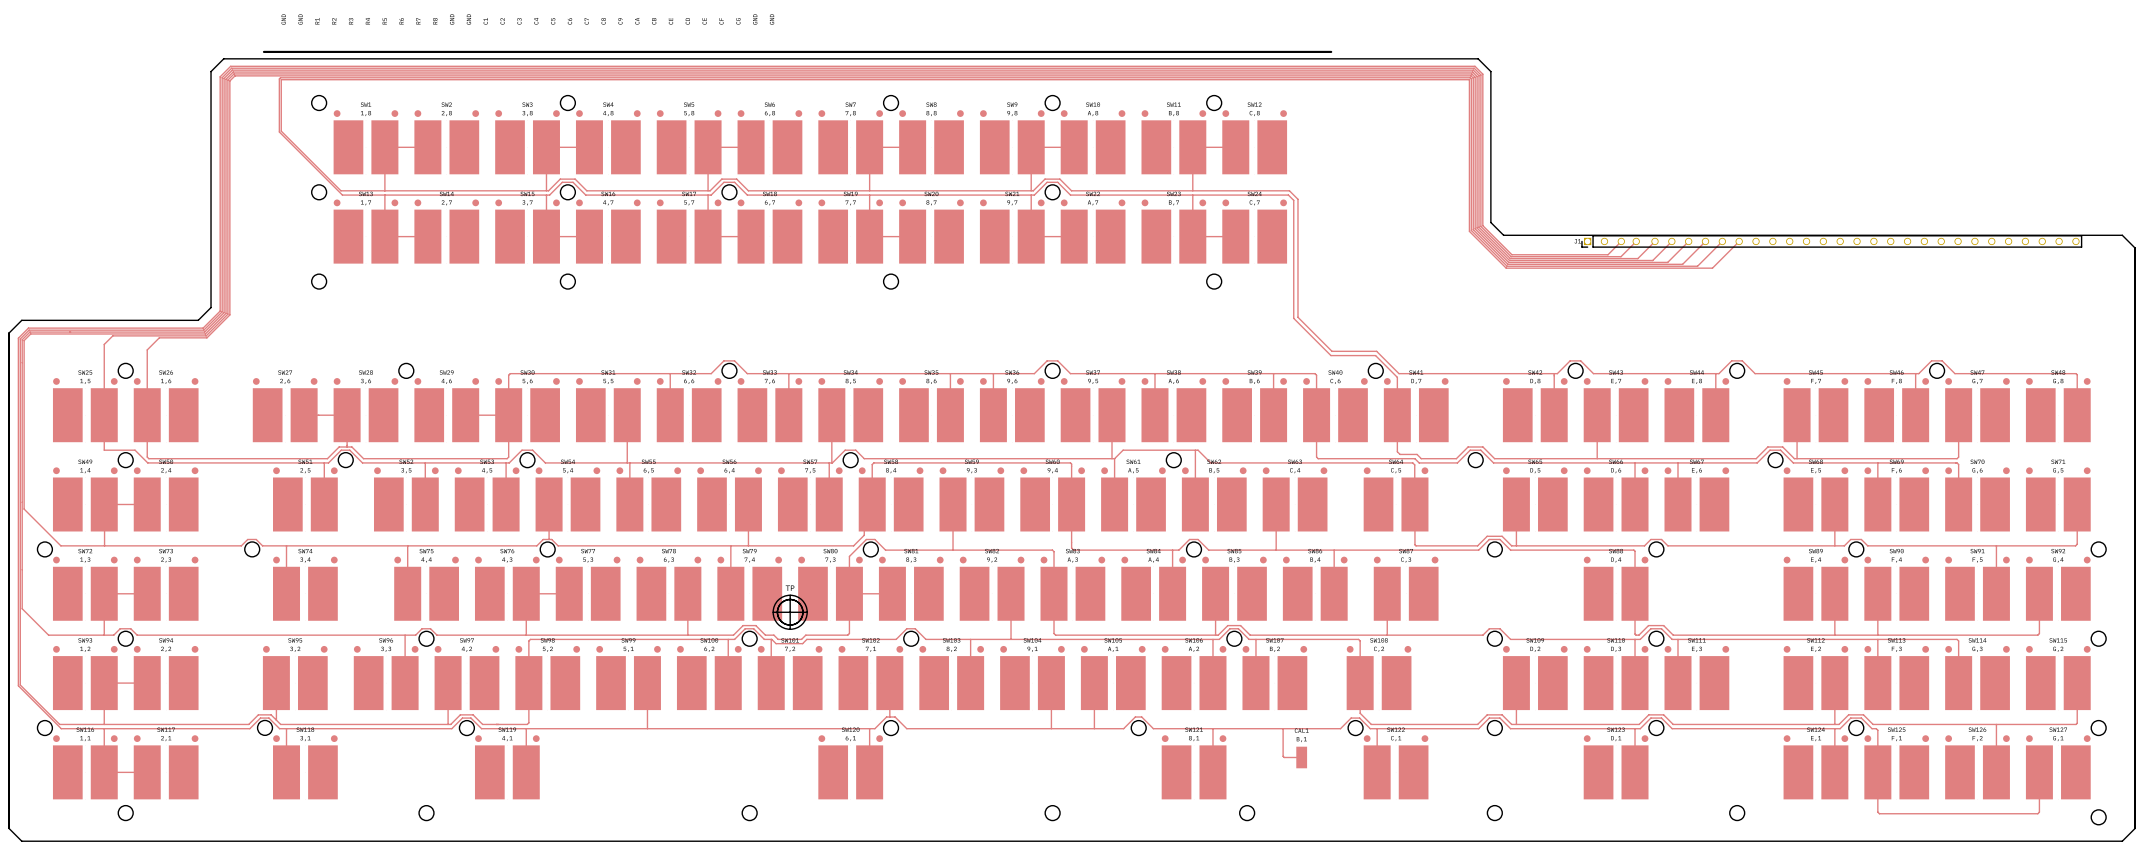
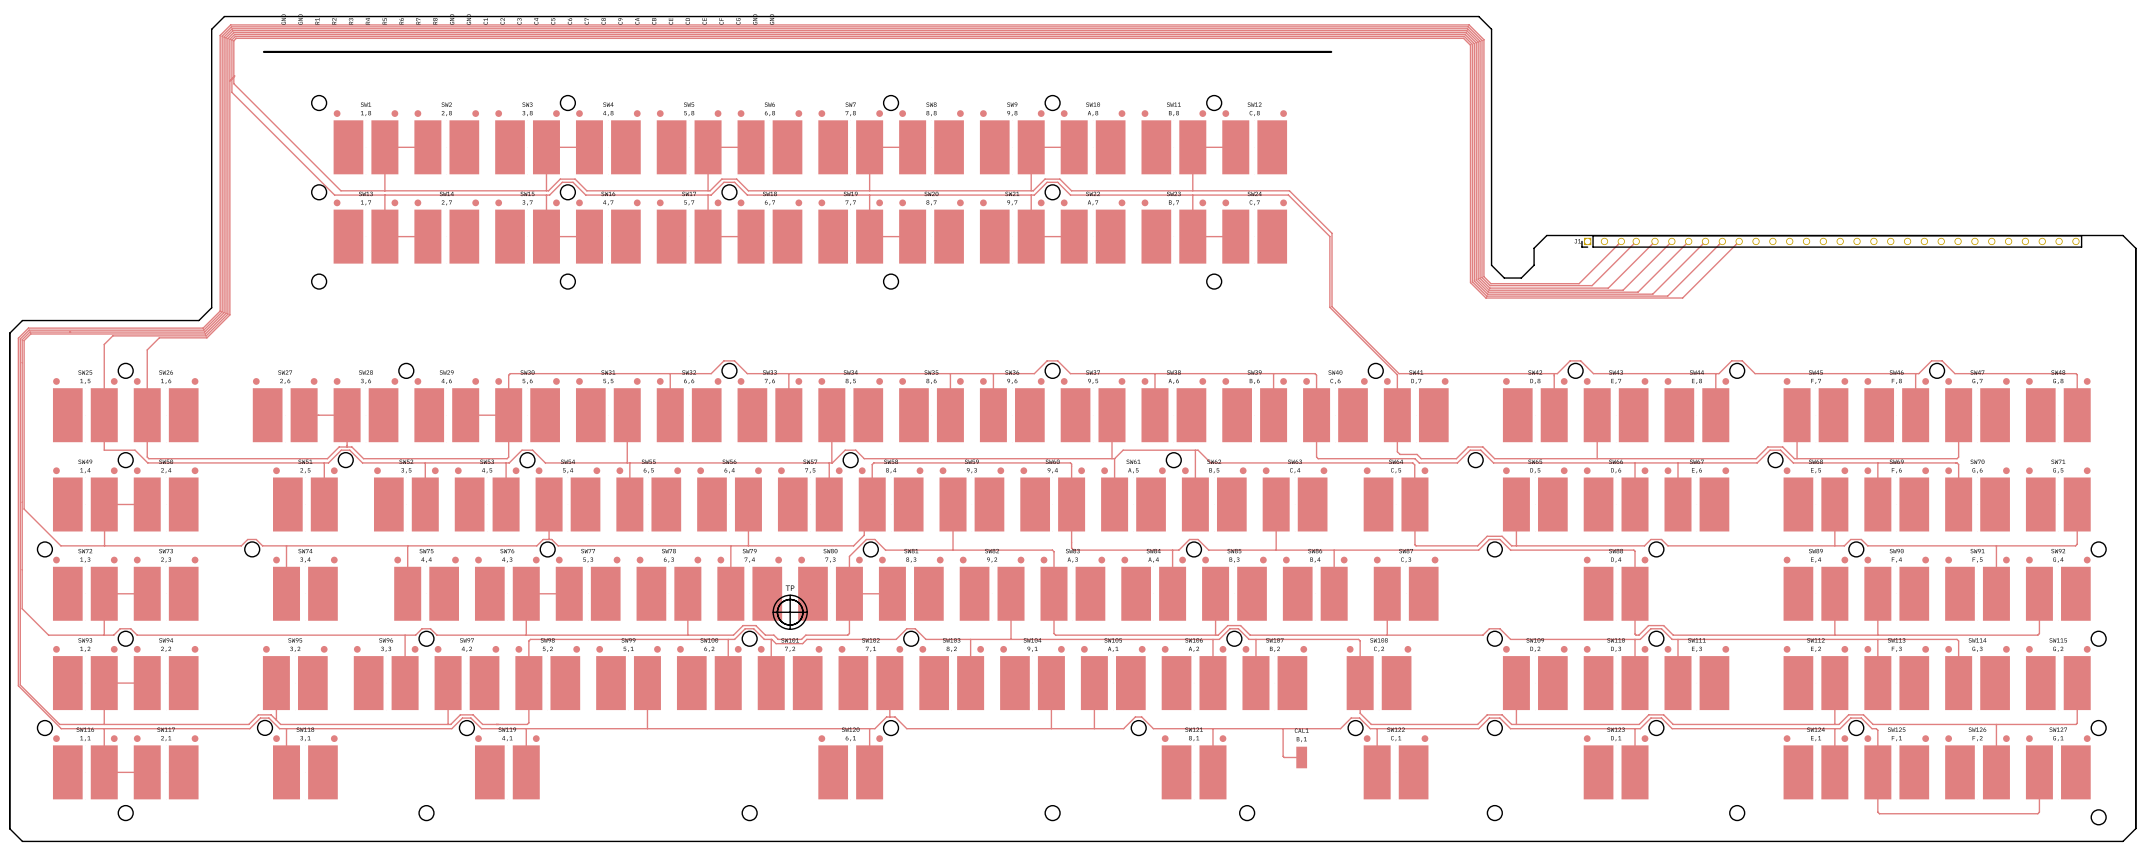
board edge: (223, 58) (1478, 58) (1490, 71) (1490, 222) (1503, 235) (2122, 235) (2135, 248) (2135, 828) (2122, 841) (21, 841) (9, 828) (9, 333) (21, 320) (198, 320) (211, 307) (211, 71) (223, 58) -> (224, 16) (211, 29) (211, 307) (198, 320) (22, 320) (9, 333) (9, 828) (22, 841) (2122, 841) (2135, 828) (2135, 248) (2122, 235) (1546, 235) (1534, 248) (1534, 265) (1521, 278) (1504, 278) (1491, 265) (1491, 29) (1478, 16) (224, 16)
track: (234, 75) (1471, 75) (1473, 78) (1473, 229) (1507, 264) (1682, 264) -> (229, 80) (229, 39) (234, 34) (1465, 34) (1474, 43) (1474, 280) (1487, 294) (1652, 294) (1682, 264)
track: (220, 76) (230, 66) (1474, 66) (1482, 74) (1482, 225) (1511, 254) (1608, 254) -> (220, 76) (220, 35) (230, 24) (1469, 24) (1483, 39) (1483, 276) (1490, 283) (1579, 283) (1608, 254)
track: (222, 77) (231, 68) (1474, 68) (1480, 74) (1480, 226) (1511, 256) (1621, 256) -> (222, 77) (222, 36) (231, 26) (1468, 26) (1482, 40) (1482, 277) (1490, 285) (1592, 285) (1621, 256)
track: (224, 78) (232, 70) (1473, 70) (1479, 75) (1479, 227) (1510, 258) (1637, 258) -> (224, 78) (224, 36) (232, 28) (1467, 28) (1480, 41) (1480, 278) (1489, 288) (1608, 288) (1637, 258)
track: (226, 79) (233, 72) (1472, 72) (1477, 76) (1477, 228) (1509, 260) (1652, 260) -> (226, 79) (226, 37) (233, 30) (1466, 30) (1478, 42) (1478, 279) (1489, 290) (1623, 290) (1652, 260)
track: (227, 80) (234, 73) (1471, 73) (1475, 77) (1475, 228) (1508, 262) (1667, 262) -> (227, 80) (227, 38) (233, 32) (1465, 32) (1476, 42) (1476, 280) (1488, 292) (1637, 292) (1667, 262)
track: (281, 131) (281, 79) (1469, 79) (1469, 231) (1506, 268) (1712, 268) -> (281, 131) (233, 83) (233, 40) (236, 38) (1463, 38) (1470, 45) (1470, 282) (1485, 298) (1682, 298) (1712, 268)
track: (342, 195) (279, 132) (280, 77) (1470, 77) (1471, 230) (1507, 266) (1697, 266) -> (342, 195) (334, 195) (231, 92) (231, 39) (235, 36) (1464, 36) (1472, 44) (1472, 281) (1486, 296) (1667, 296) (1697, 266)
track: (1297, 199) (1297, 317) (1332, 351) (1376, 351) -> (1297, 199) (1332, 233) (1332, 306) (1376, 351)
track: (1293, 200) (1293, 318) (1330, 355) (1375, 355) (1397, 377) -> (1293, 200) (1329, 236) (1329, 307) (1397, 374) (1397, 377)

